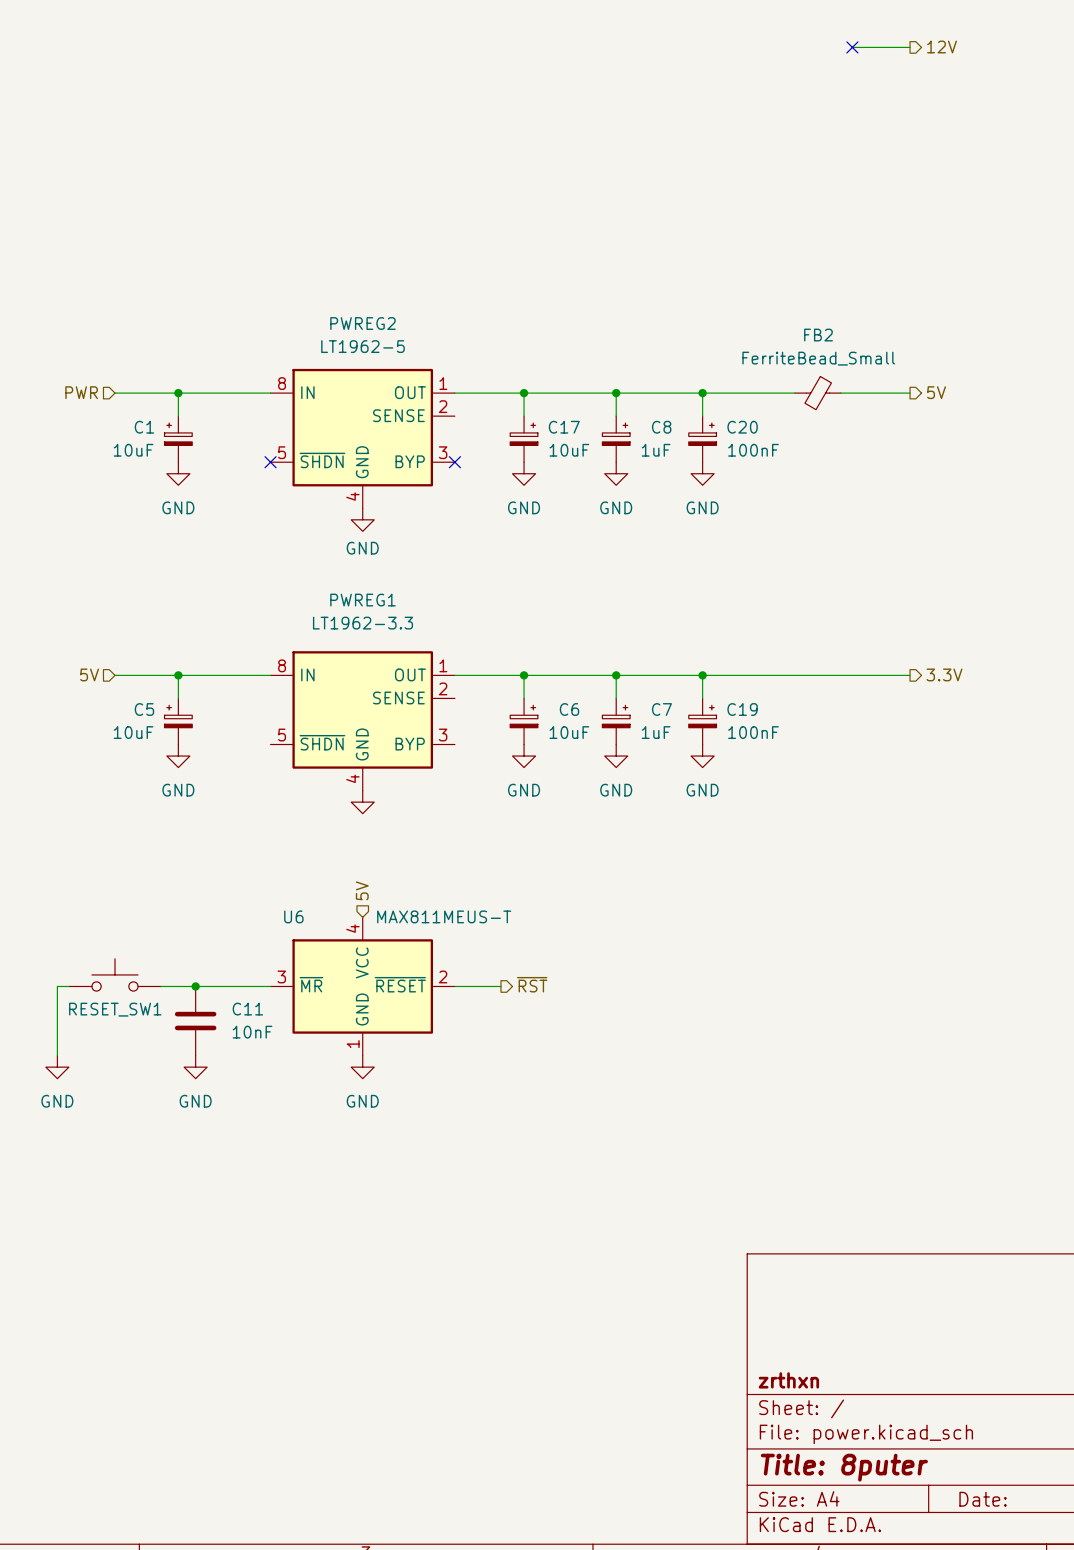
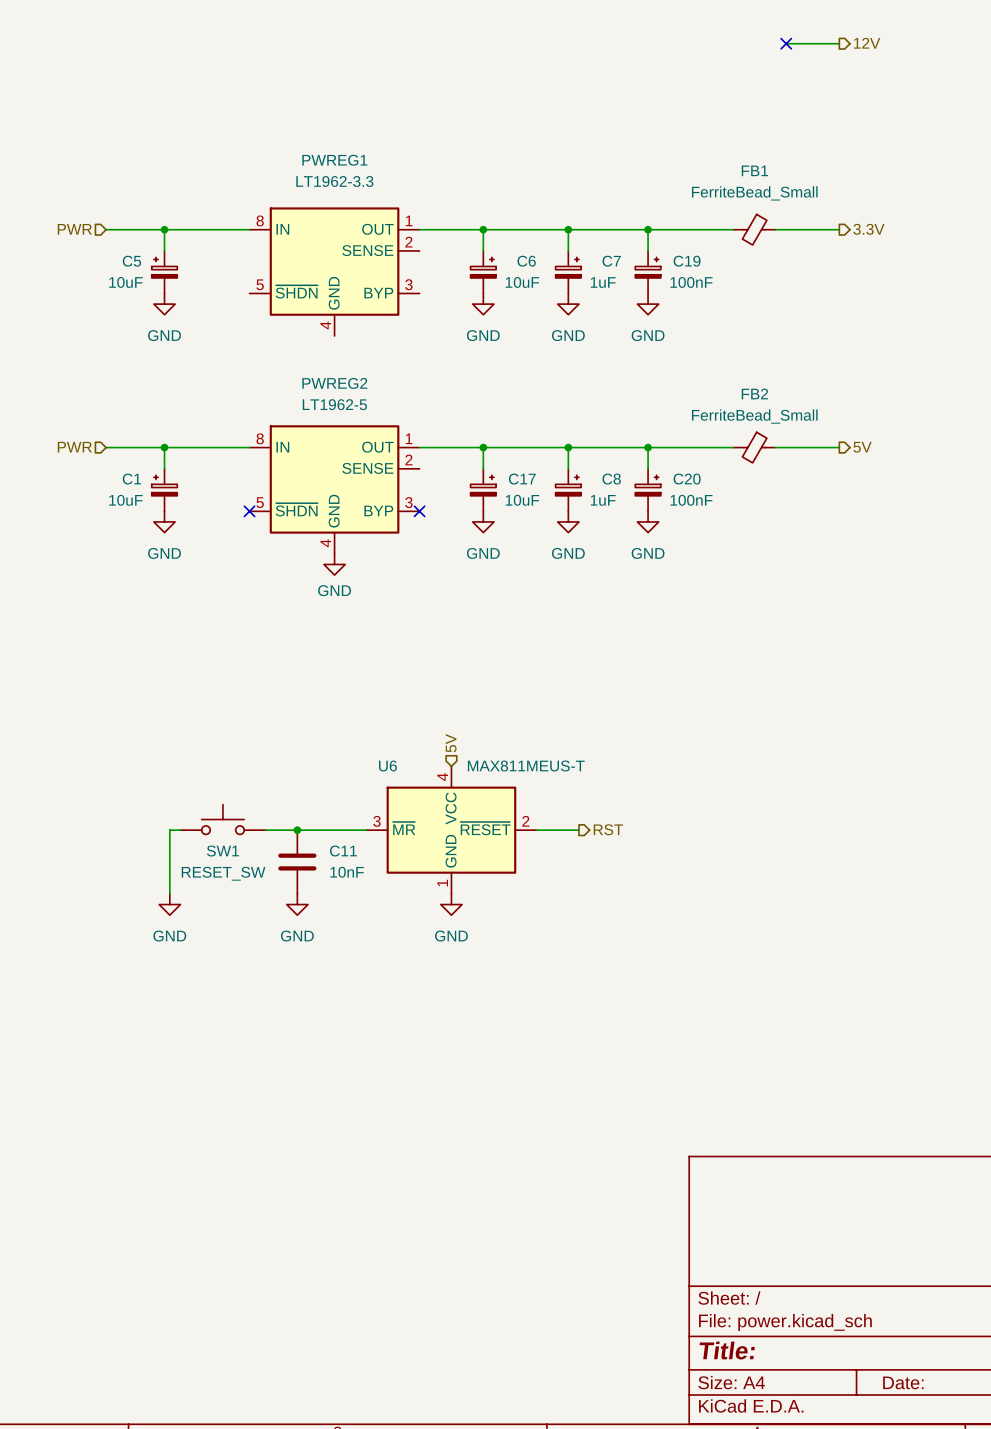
hierarchical label: none -> PWR (74, 229)
hierarchical label: none -> 3.3V (869, 229)
wire: none -> (106, 229) (249, 229)
wire: none -> (164, 229) (164, 250)
junction: none -> (164, 229)
wire: none -> (419, 229) (733, 229)
wire: none -> (483, 229) (483, 250)
junction: none -> (483, 229)
wire: none -> (568, 229) (568, 250)
junction: none -> (568, 229)
wire: none -> (648, 229) (648, 250)
junction: none -> (648, 229)
FB1: none -> FerriteBead_Small (754, 229)
wire: none -> (775, 229) (839, 229)
power symbol: none -> GND (164, 304)
power symbol: none -> GND (483, 304)
power symbol: none -> GND (568, 304)
power symbol: none -> GND (648, 304)
hierarchical label: PWR (81, 392) -> none
hierarchical label position: 5V (936, 392) -> 5V (862, 447)
wire: (115, 393) (270, 393) -> (106, 447) (249, 447)
wire: (178, 393) (178, 416) -> (164, 447) (164, 468)
junction: (178, 393) -> none
wire: (454, 393) (794, 393) -> (419, 447) (733, 447)
wire: (524, 393) (524, 416) -> (483, 447) (483, 468)
junction: (524, 393) -> none
wire: (616, 393) (616, 416) -> (568, 447) (568, 468)
junction: (616, 393) -> none
wire: (702, 393) (702, 416) -> (648, 447) (648, 468)
junction: (702, 393) -> none
FB2 position: (817, 393) -> (754, 447)
wire: (840, 393) (910, 393) -> (775, 447) (839, 447)
PWREG2 position: (362, 438) -> (334, 489)
C1 position: (178, 439) -> (164, 490)
C17 position: (524, 439) -> (483, 490)
C8 position: (616, 439) -> (568, 490)
C20 position: (702, 439) -> (648, 490)
no-connect mark: (270, 462) -> none
no-connect mark: (454, 462) -> none
power symbol: GND (178, 473) -> none
power symbol: GND (524, 473) -> none
power symbol: GND (616, 473) -> none
power symbol: GND (702, 473) -> none
hierarchical label: none -> PWR (74, 447)
junction: none -> (164, 447)
junction: none -> (483, 447)
junction: none -> (568, 447)
junction: none -> (648, 447)
power symbol: GND (362, 519) -> none
no-connect mark: none -> (249, 511)
no-connect mark: none -> (419, 511)
power symbol: none -> GND (164, 521)
power symbol: none -> GND (483, 521)
power symbol: none -> GND (568, 521)
power symbol: none -> GND (648, 521)
power symbol: none -> GND (334, 564)
hierarchical label: 5V (89, 674) -> none
hierarchical label: 3.3V (944, 674) -> none
wire: (115, 675) (270, 675) -> none
wire: (178, 675) (178, 698) -> none
junction: (178, 675) -> none
wire: (454, 675) (910, 675) -> none
wire: (524, 675) (524, 698) -> none
junction: (524, 675) -> none
wire: (616, 675) (616, 698) -> none
junction: (616, 675) -> none
wire: (702, 675) (702, 698) -> none
junction: (702, 675) -> none
PWREG1 position: (362, 720) -> (334, 271)
C5 position: (178, 721) -> (164, 272)
C6 position: (524, 721) -> (483, 272)
C7 position: (616, 721) -> (568, 272)
C19 position: (702, 721) -> (648, 272)
power symbol: GND (178, 756) -> none
power symbol: GND (524, 756) -> none
power symbol: GND (616, 756) -> none
power symbol: GND (702, 756) -> none
power symbol: (362, 802) -> none
SW1: none -> RESET_SW (222, 819)
hierarchical label position: 5V (362, 890) -> 5V (451, 743)
hierarchical label: none -> RST (608, 829)
junction: none -> (297, 830)
RESET_SW1: (115, 974) -> none
power symbol: none -> GND (169, 904)
power symbol: none -> GND (297, 904)
power symbol: none -> GND (451, 904)
hierarchical label: ~{RST} (532, 984) -> none
wire: (68, 986) (57, 986) (57, 1055) -> (180, 830) (169, 830) (169, 893)
wire: (161, 986) (270, 986) -> (265, 830) (366, 830)
junction: (195, 986) -> none
U6 position: (362, 986) -> (451, 830)
wire: (454, 986) (500, 986) -> (536, 830) (578, 830)
C11 position: (195, 1021) -> (297, 862)
power symbol: GND (57, 1067) -> none
power symbol: GND (195, 1067) -> none
power symbol: GND (362, 1067) -> none
title block: zrthxn (788, 1380) -> none
title block: Title: 8puter (844, 1467) -> Title: (727, 1350)

